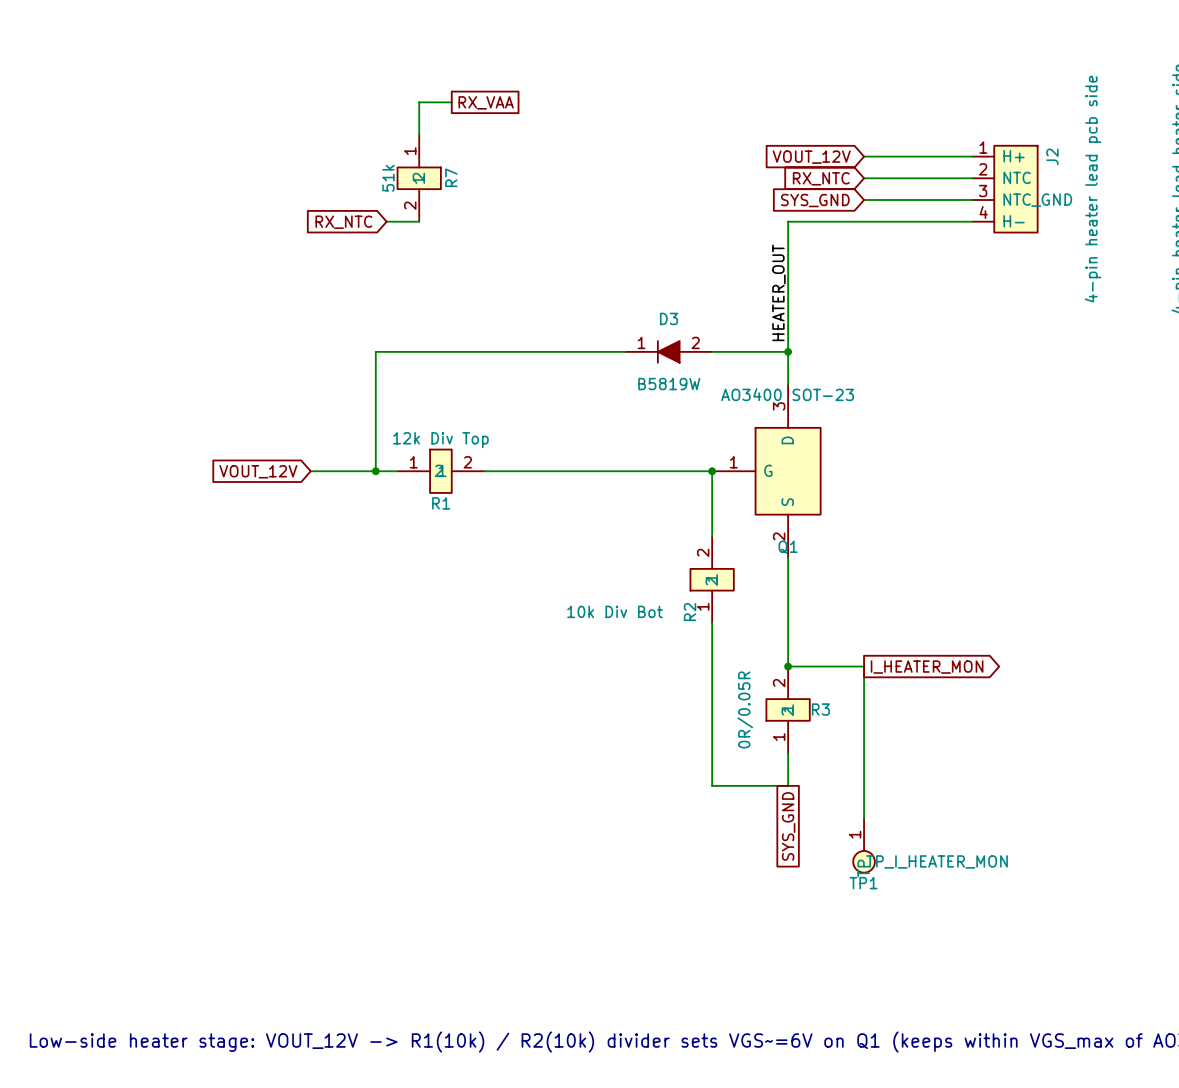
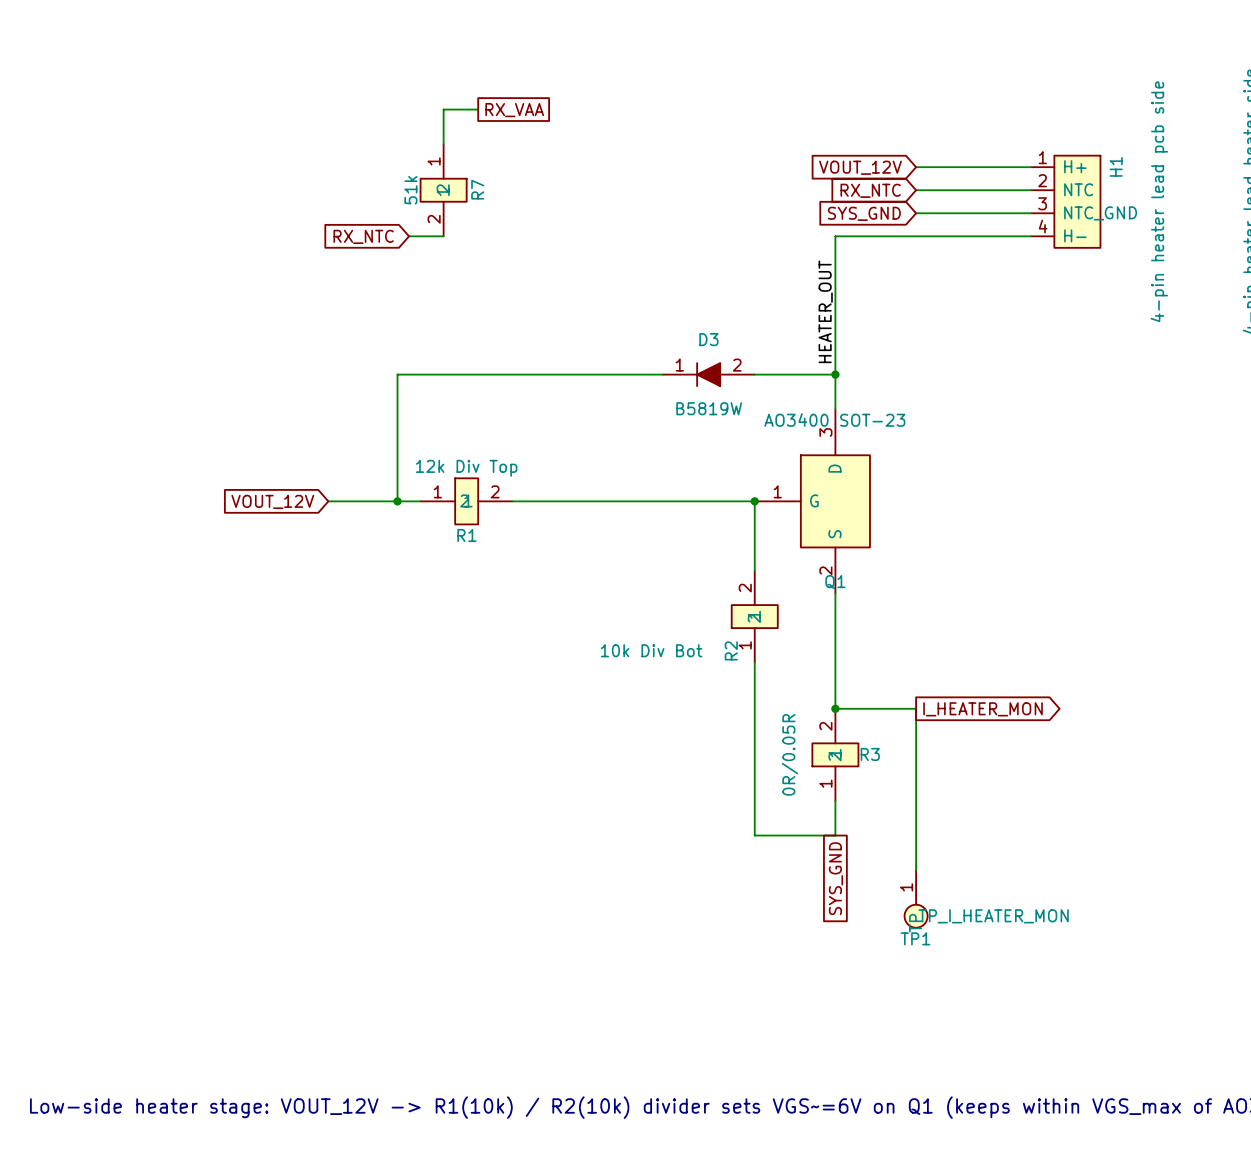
J2 name: J2 (1052, 156) -> H1 (1116, 166)

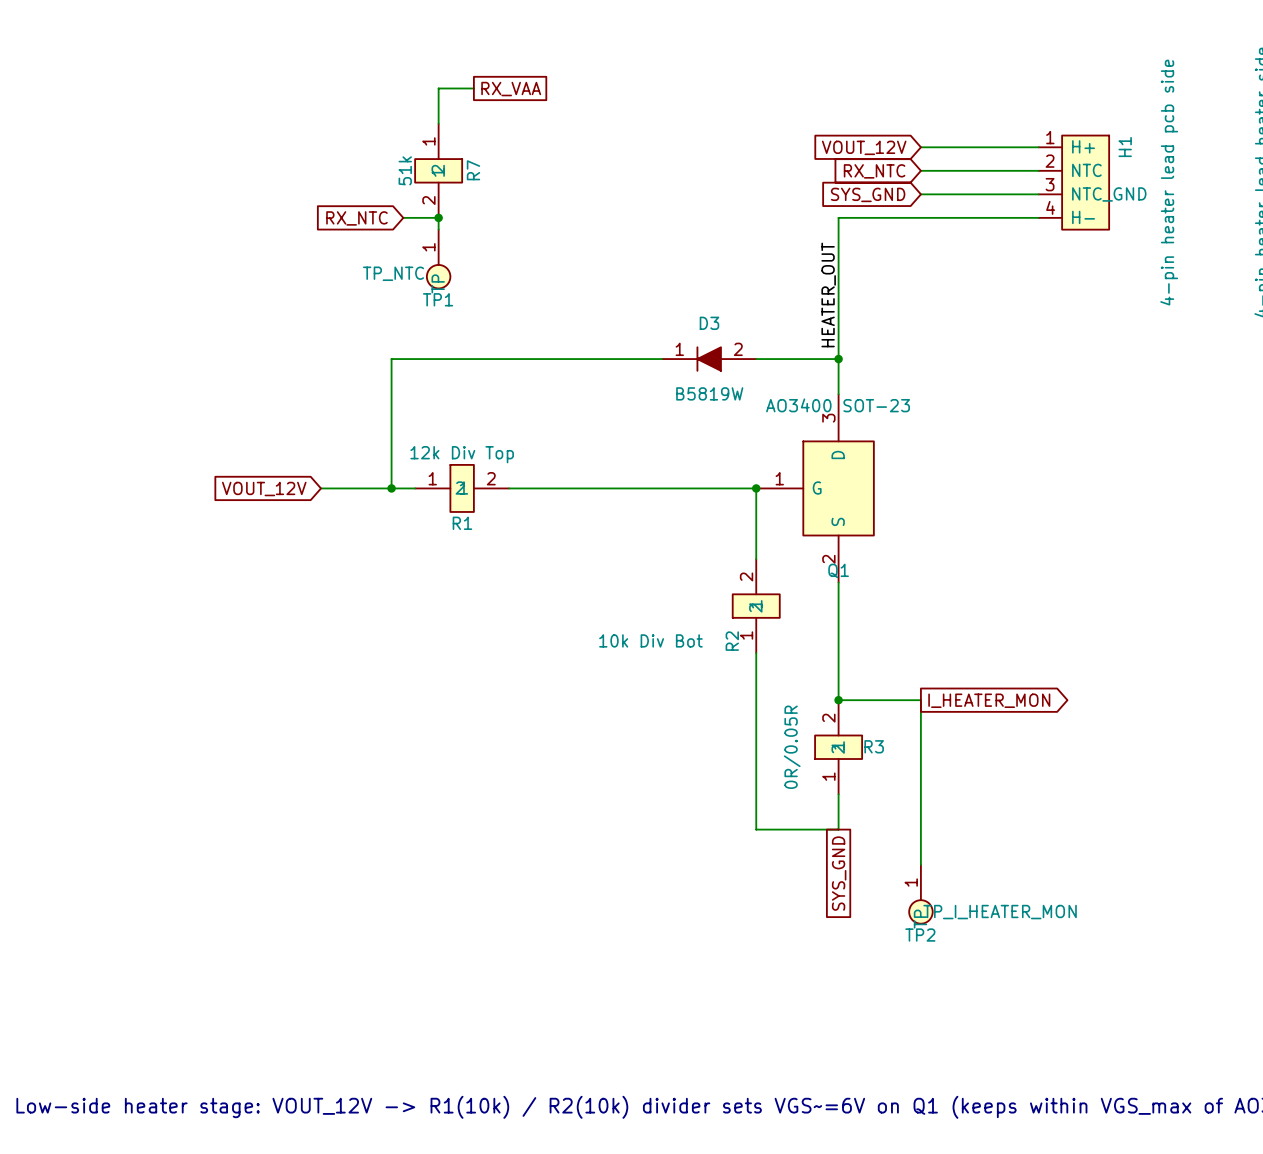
wire: none -> (438, 217) (438, 229)
junction: none -> (438, 217)
TP1: none -> TP_NTC (438, 259)
TP1 name: TP1 (915, 938) -> TP2 (920, 935)

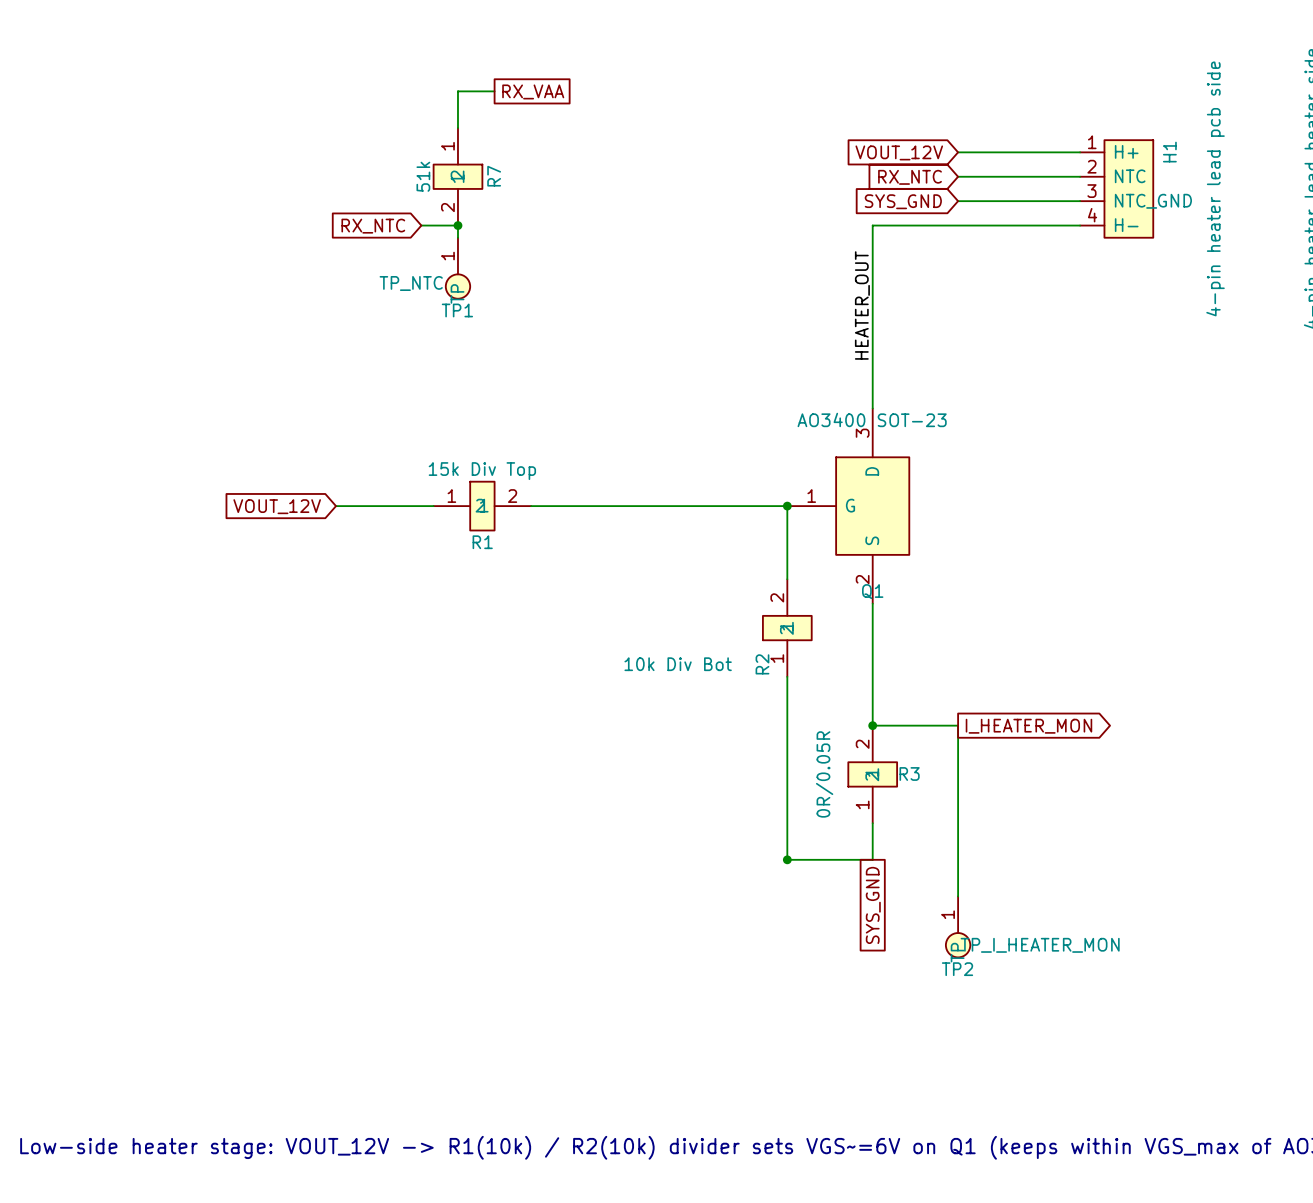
wire: (662, 359) (391, 359) (391, 488) -> none
D3: B5819W (709, 359) -> none
wire: (756, 359) (838, 359) -> none
junction: (838, 359) -> none
R1 value: 12k Div Top (462, 454) -> 15k Div Top (482, 471)
junction: (391, 488) -> none
junction: none -> (787, 859)

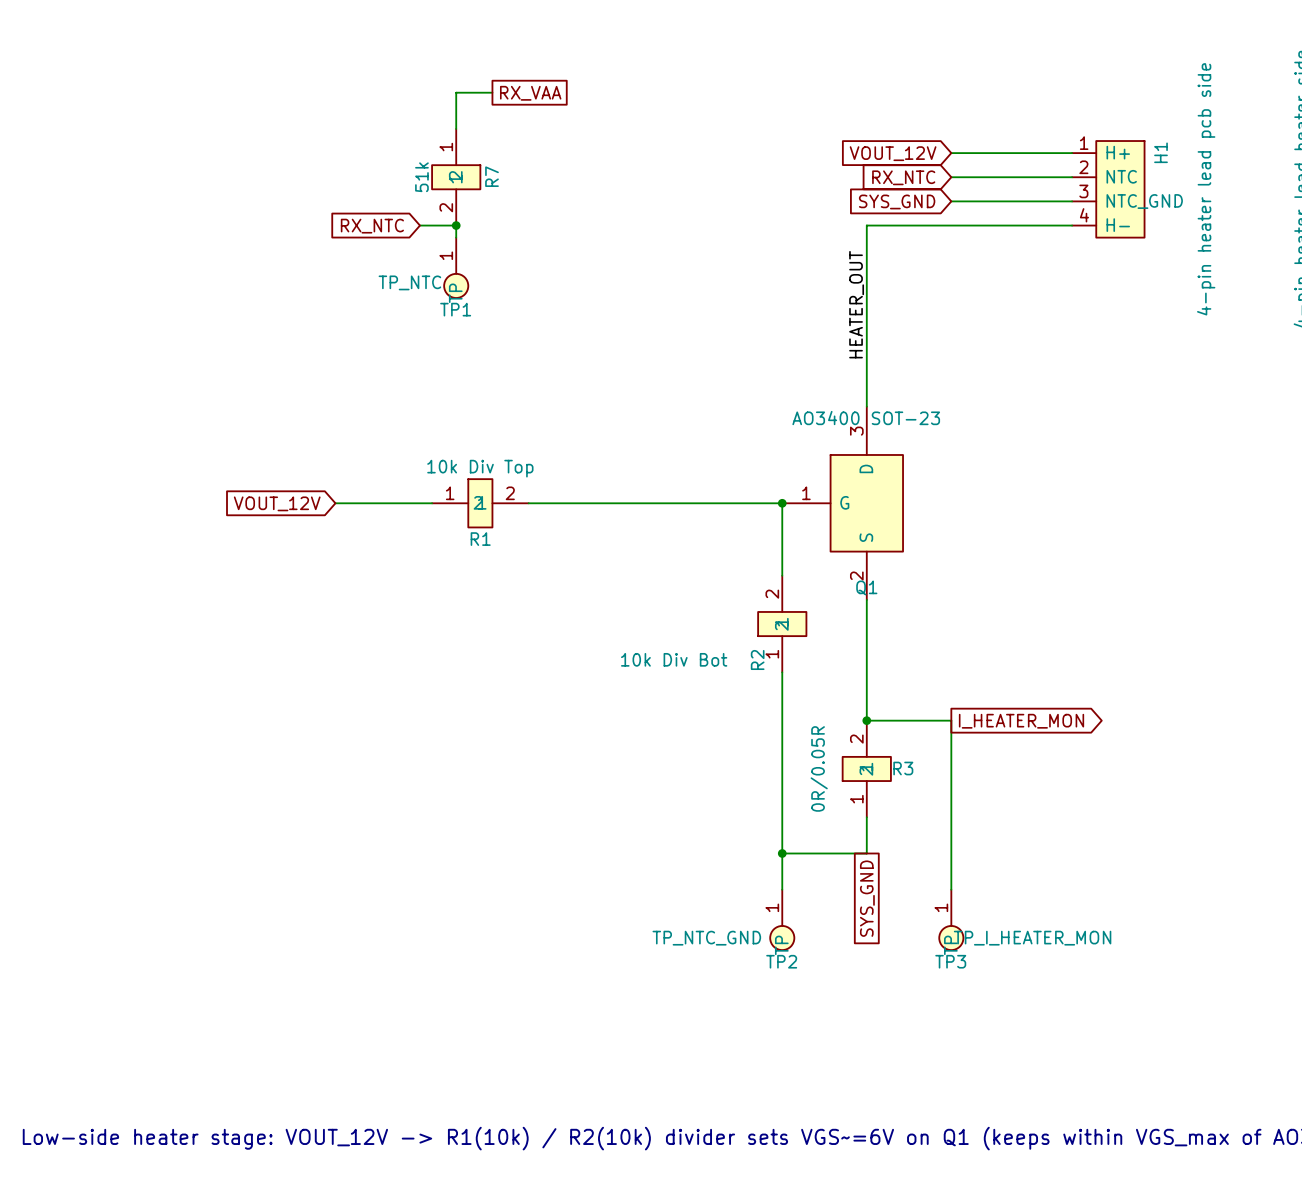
R1 value: 15k Div Top (482, 471) -> 10k Div Top (480, 468)
wire: none -> (782, 853) (782, 889)
TP2: none -> TP_NTC_GND (782, 920)
TP2 name: TP2 (957, 969) -> TP3 (950, 961)

